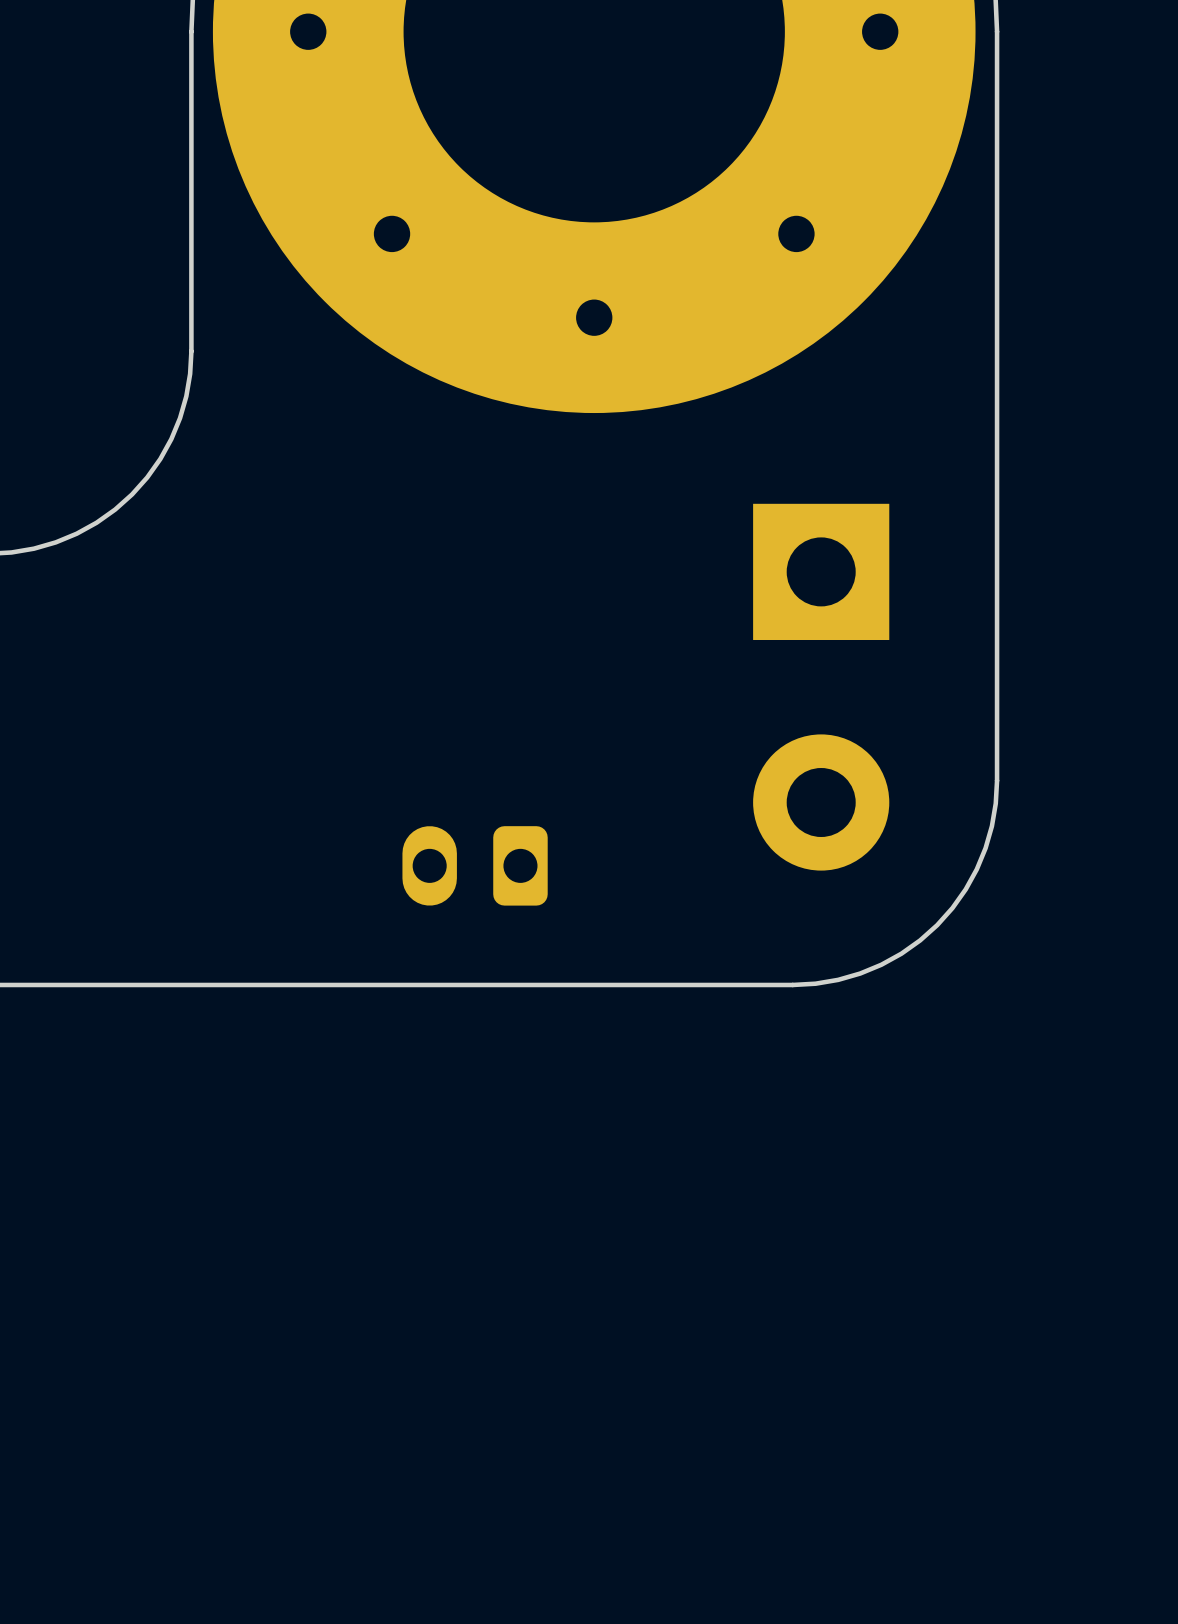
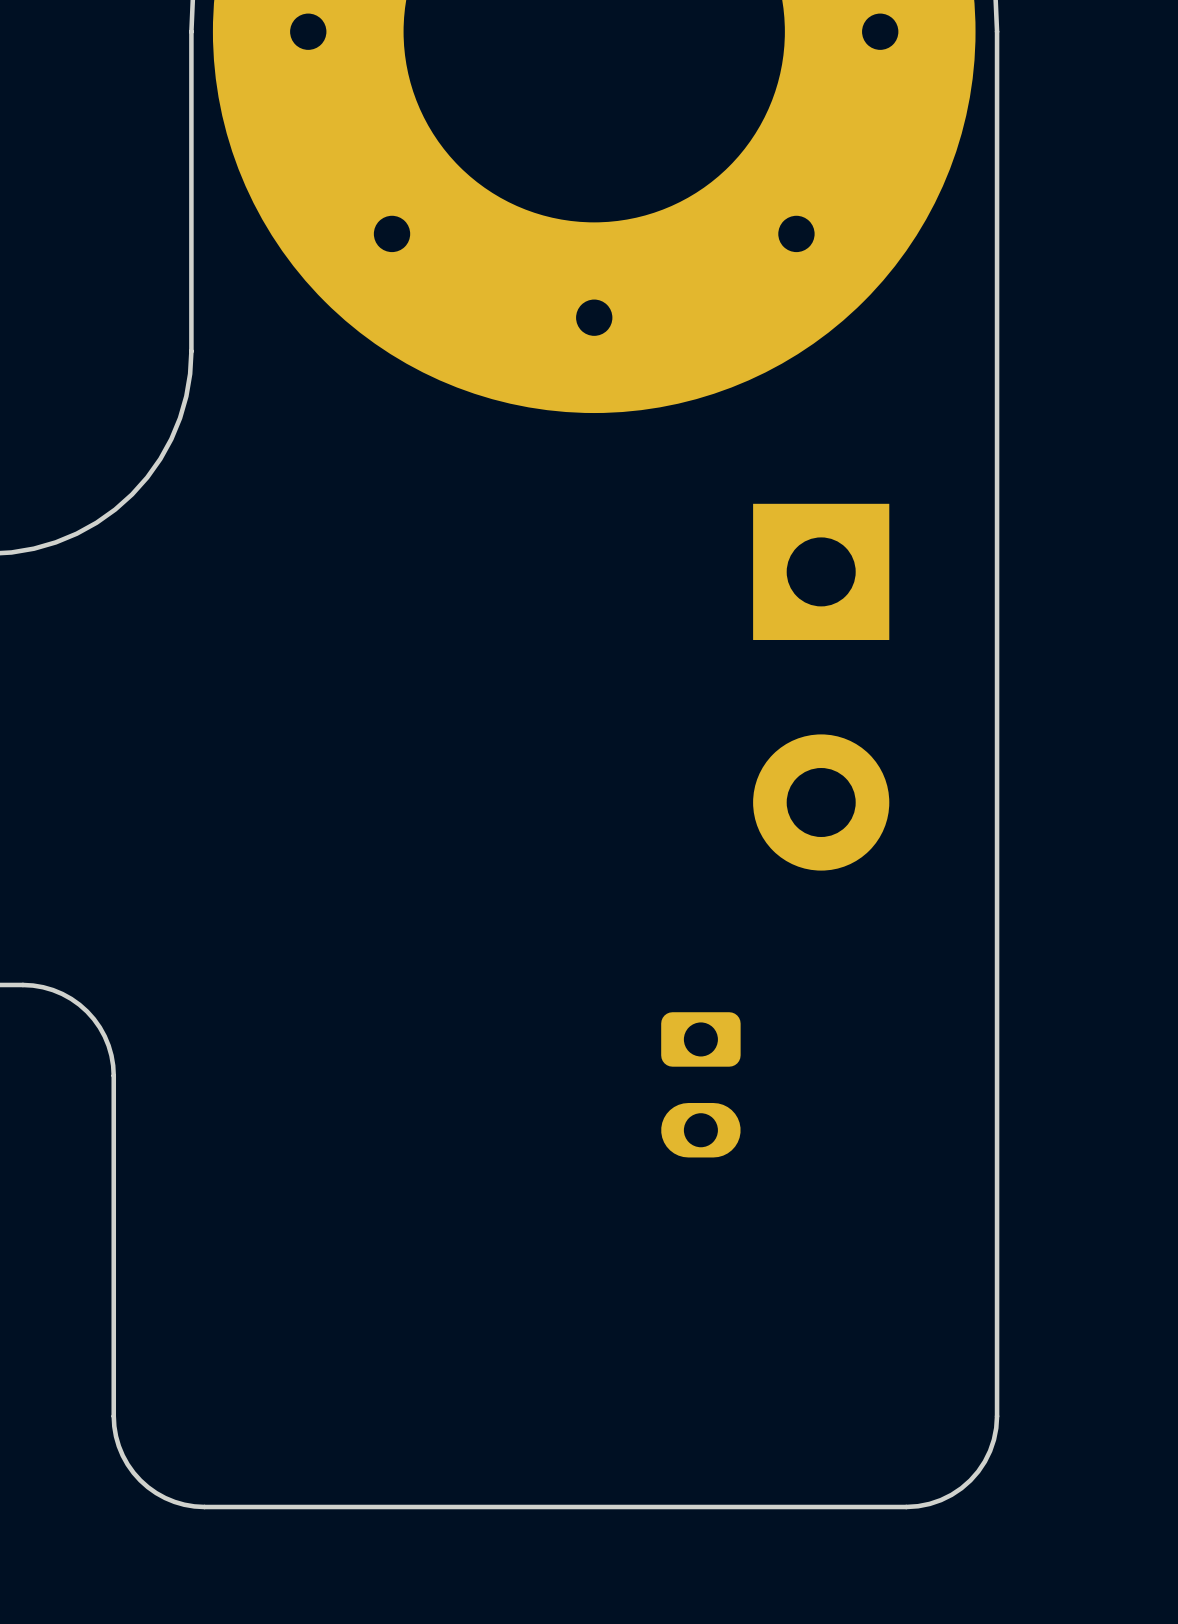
board edge: (997, 780) (991, 826) (985, 848) (965, 889) (952, 908) (920, 940) (901, 953) (860, 973) (838, 979) (792, 984) (22, 984) -> (997, 780) (996, 1428) (990, 1450) (978, 1471) (961, 1488) (951, 1494) (929, 1503) (906, 1507) (204, 1507) (174, 1501) (156, 1493) (140, 1480) (127, 1464) (118, 1446) (114, 1426) (113, 1075) (111, 1055) (99, 1027) (79, 1004) (52, 990) (22, 984)
part rotation: 0° (475, 865) -> 90° counterclockwise (700, 1084)
part position: (475, 865) -> (700, 1084)

